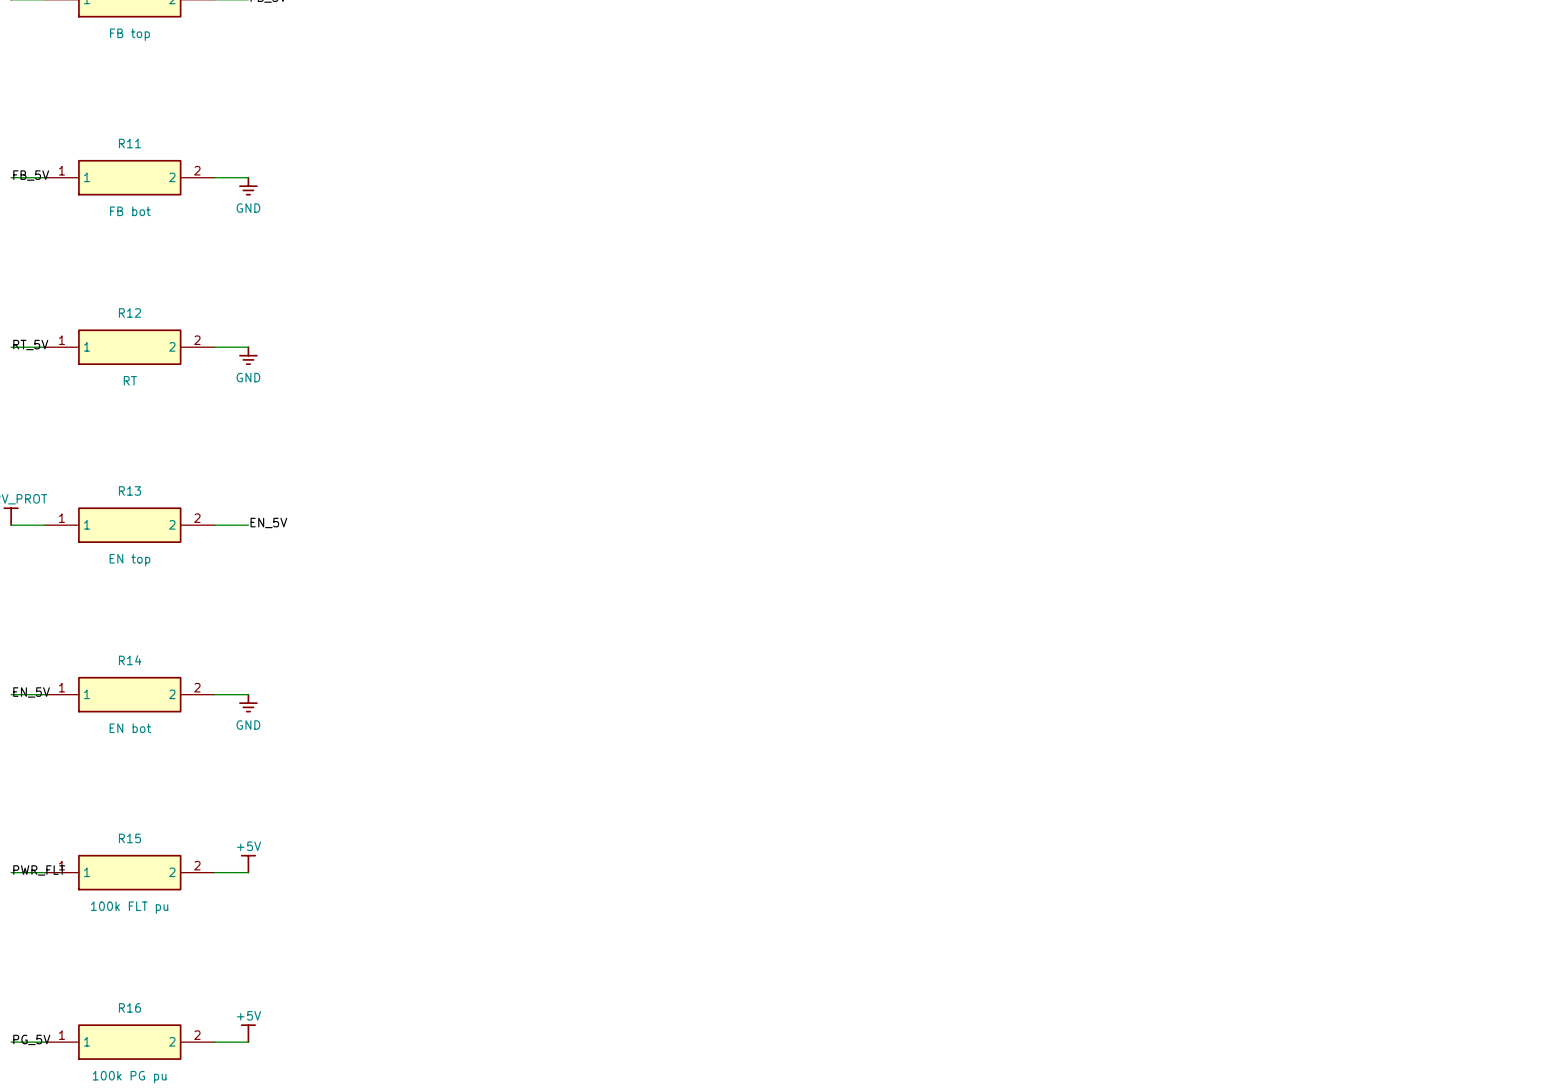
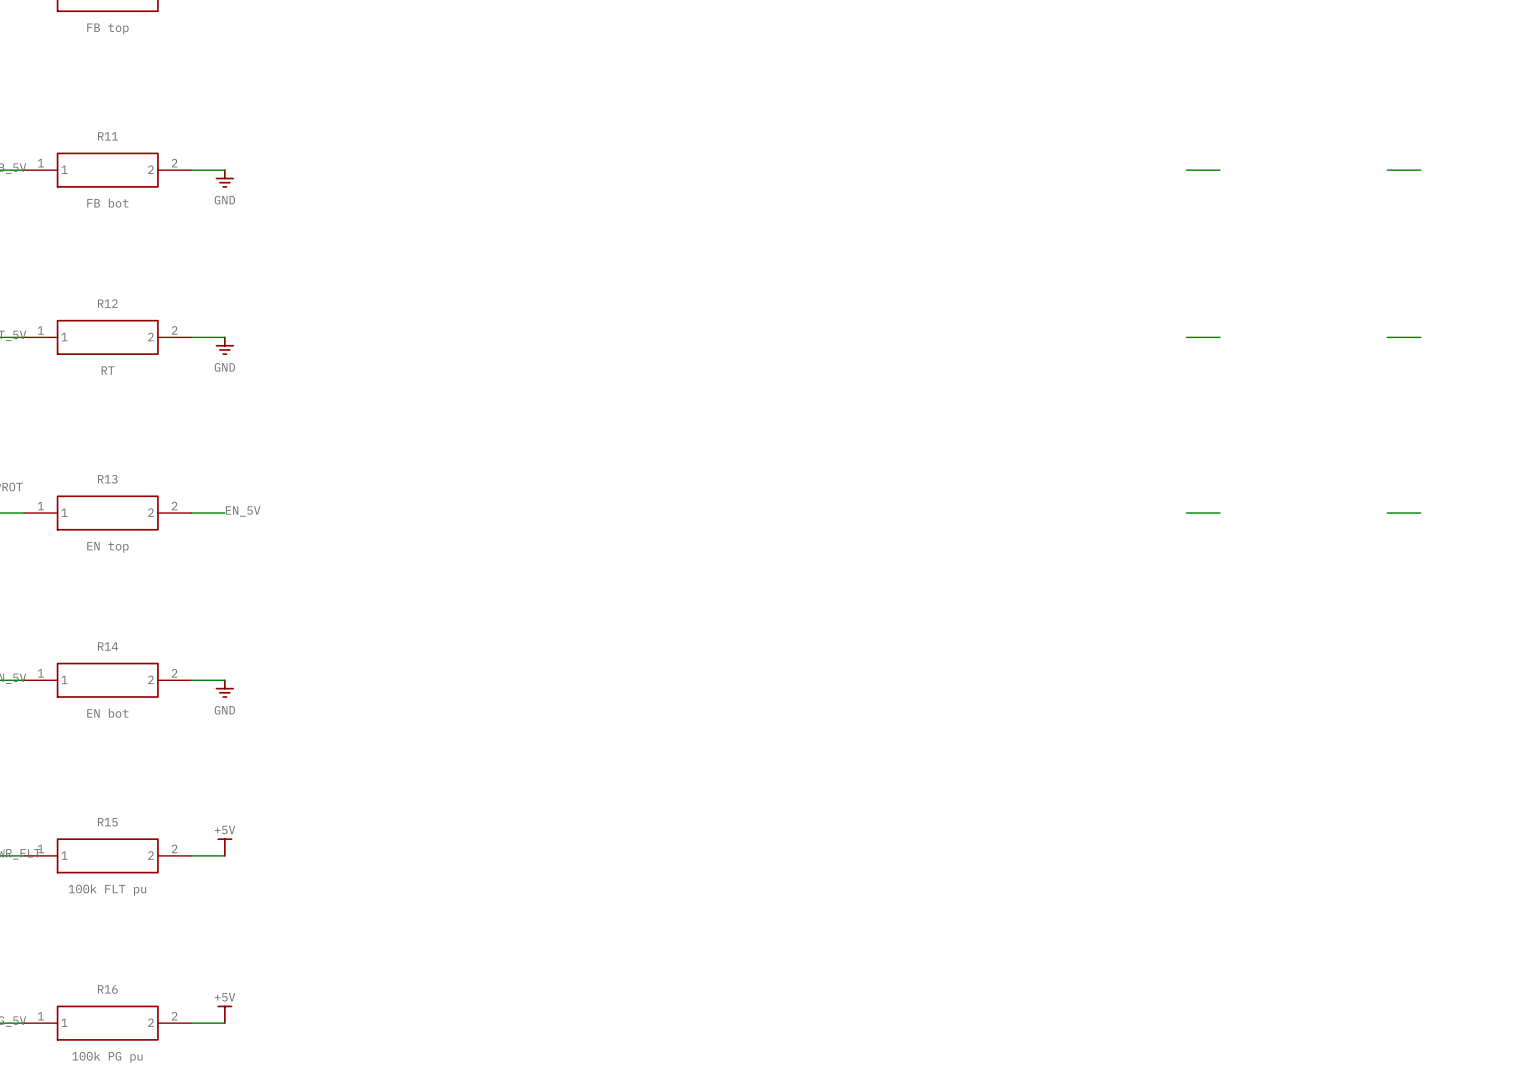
wire: none -> (1186, 170) (1220, 170)
wire: none -> (1387, 170) (1420, 170)
wire: none -> (1186, 337) (1220, 337)
wire: none -> (1387, 337) (1420, 337)
wire: none -> (1186, 513) (1220, 513)
wire: none -> (1387, 513) (1420, 513)

